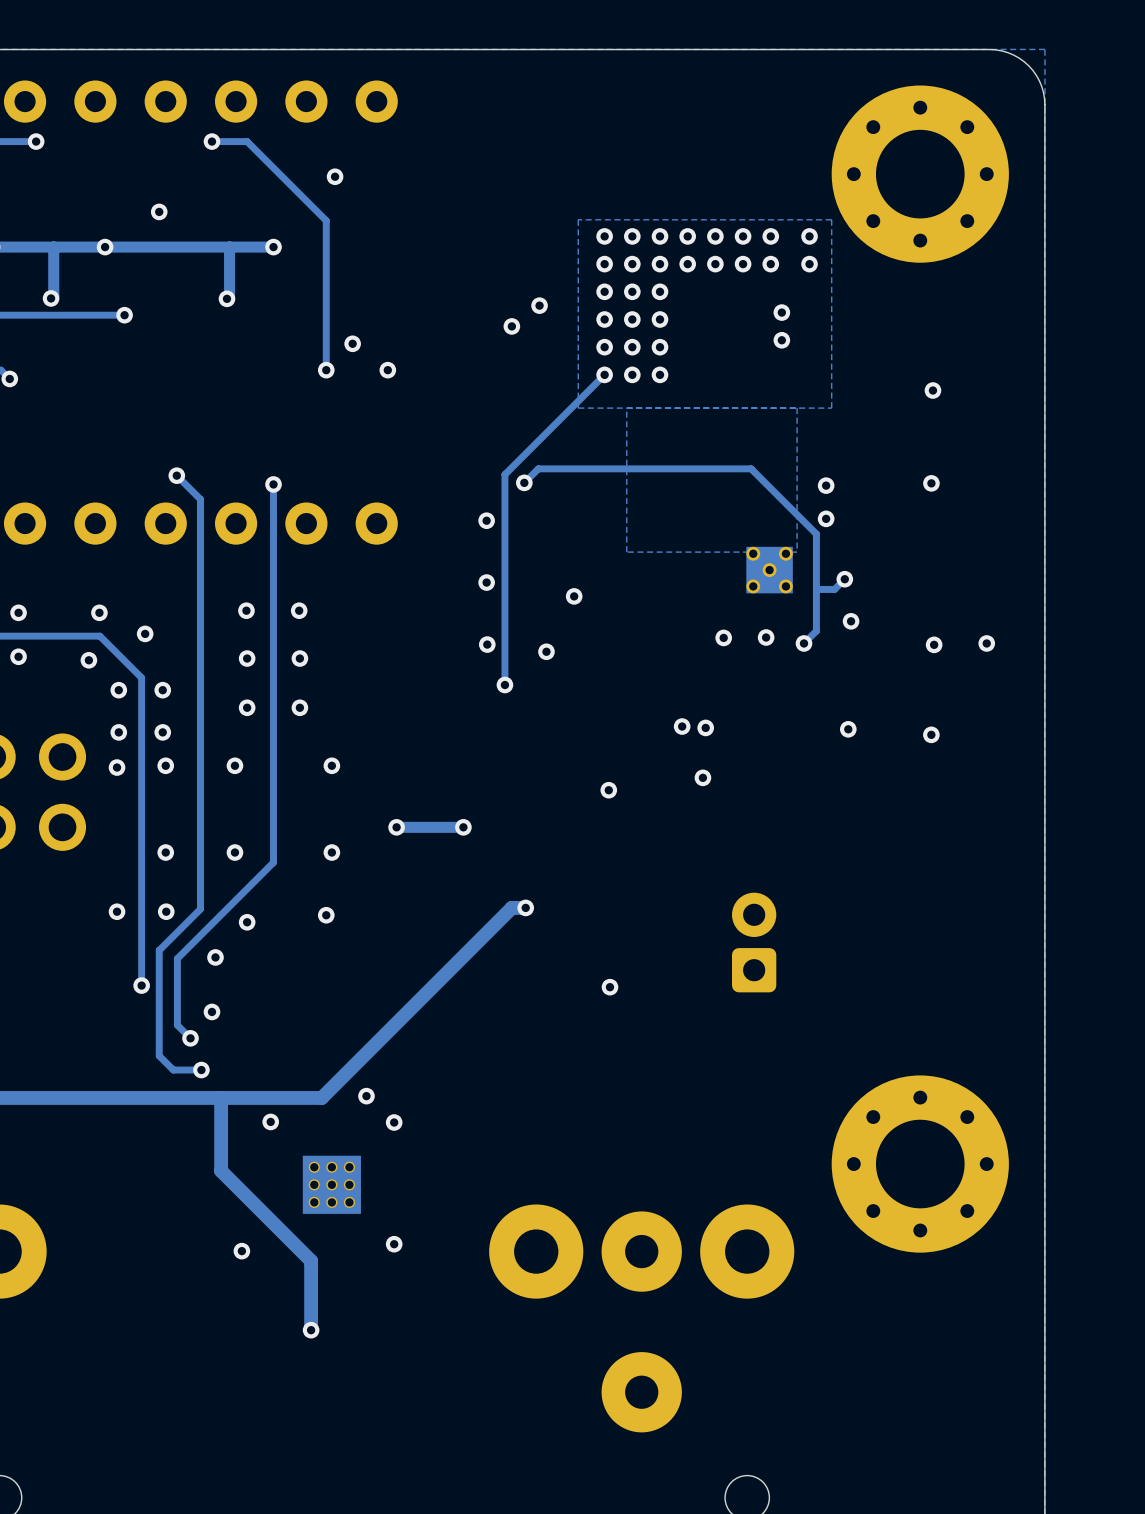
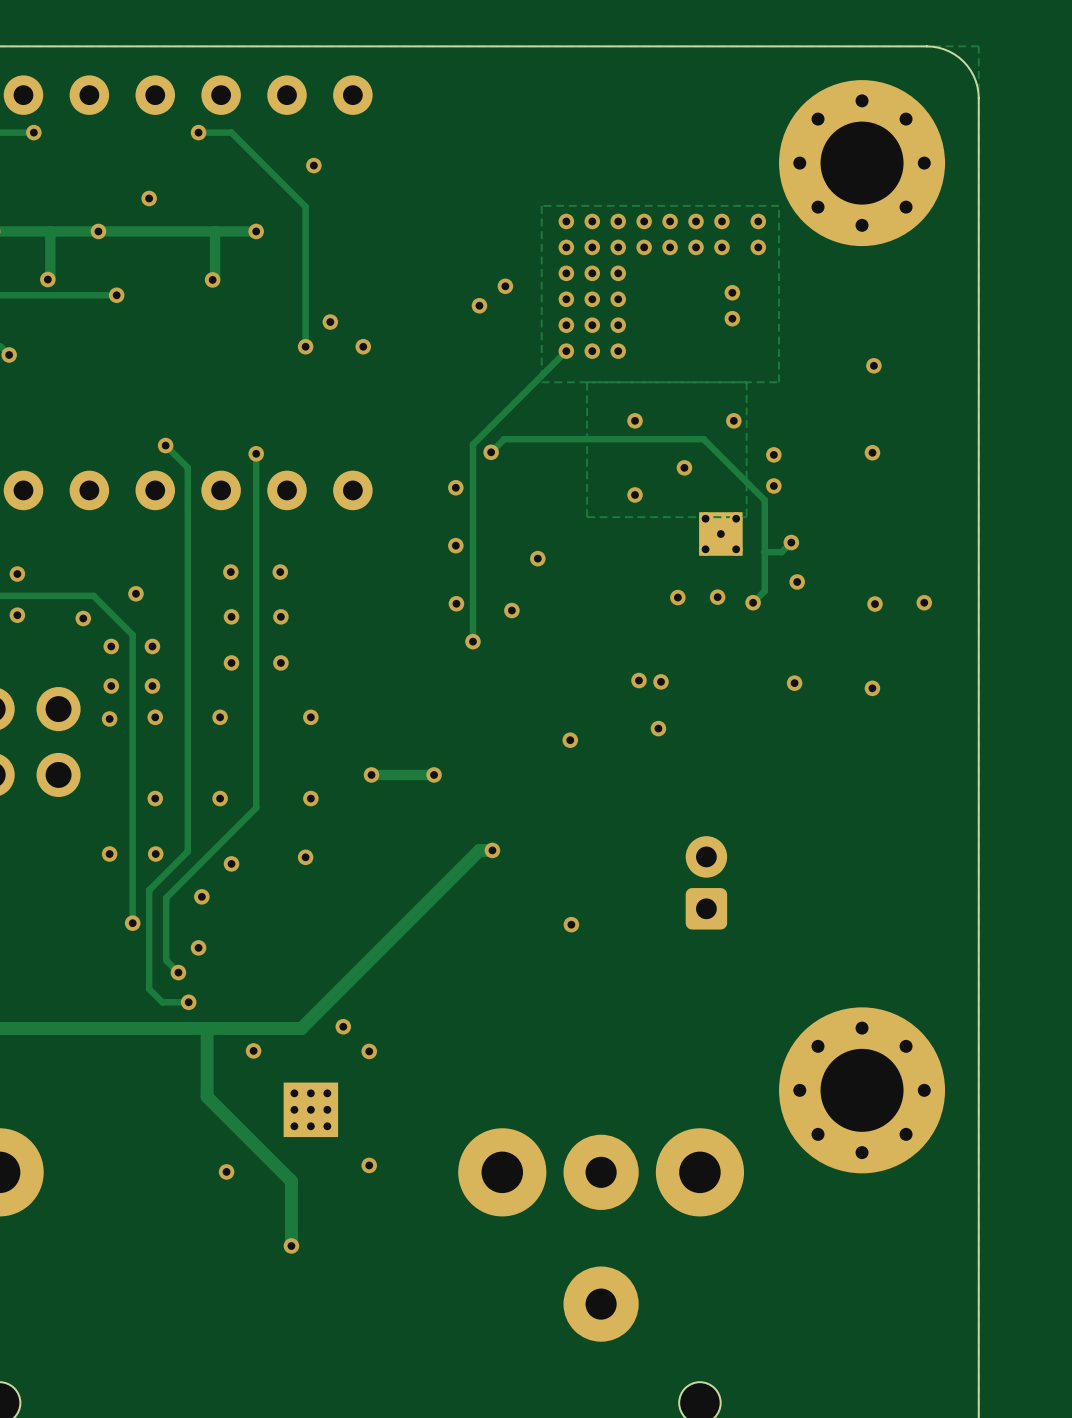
via: none -> (635, 420)
via: none -> (733, 420)
via: none -> (684, 467)
via: none -> (635, 494)
via: (99, 612) -> none

